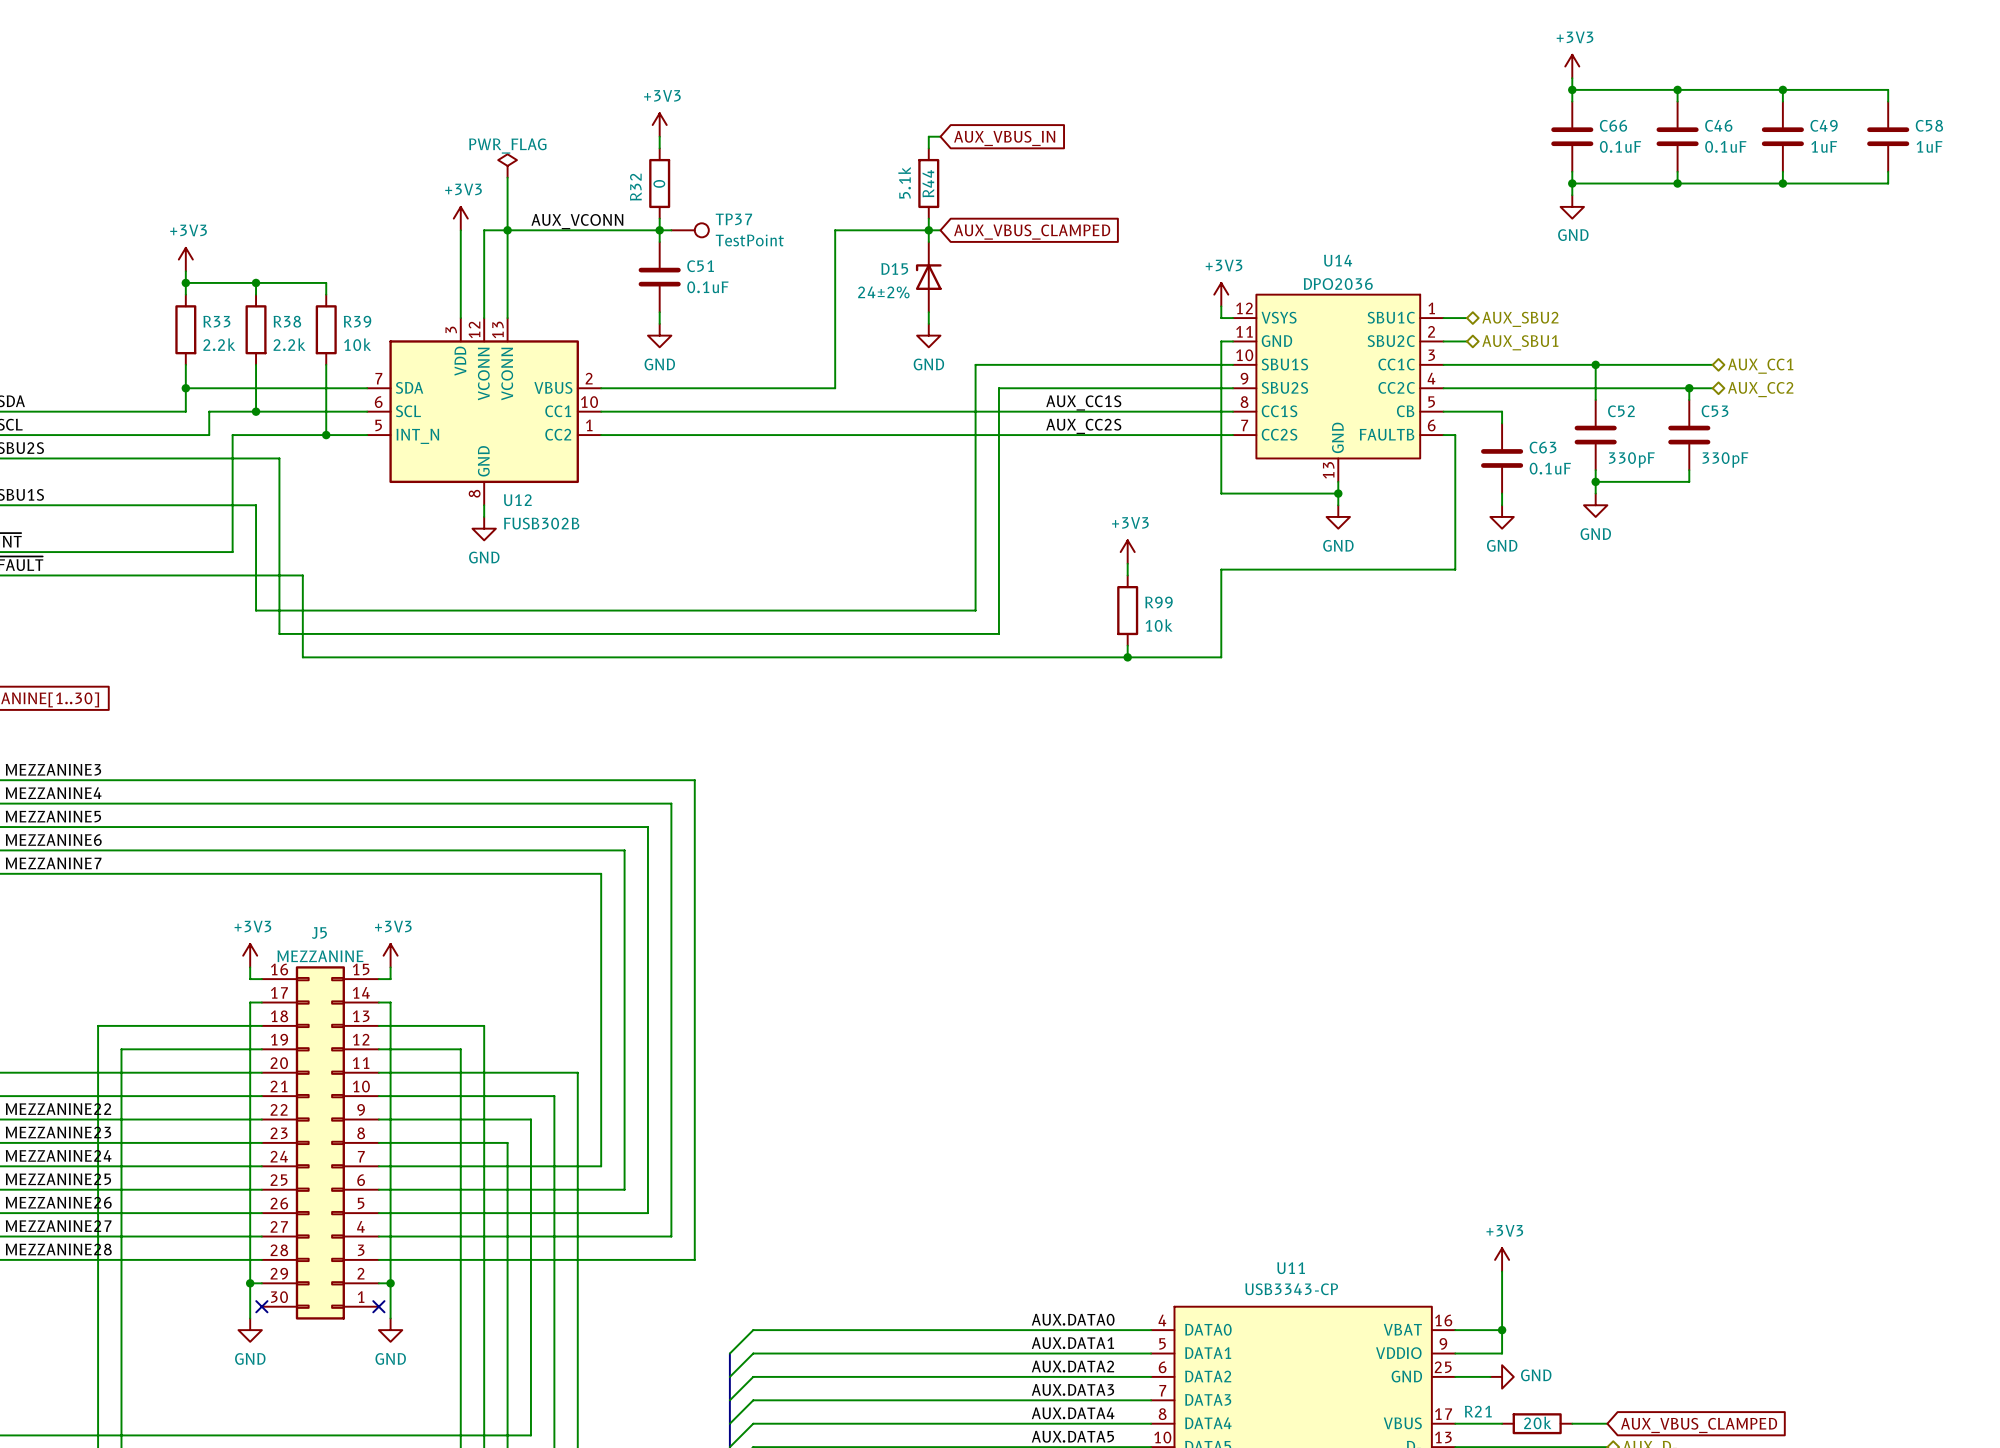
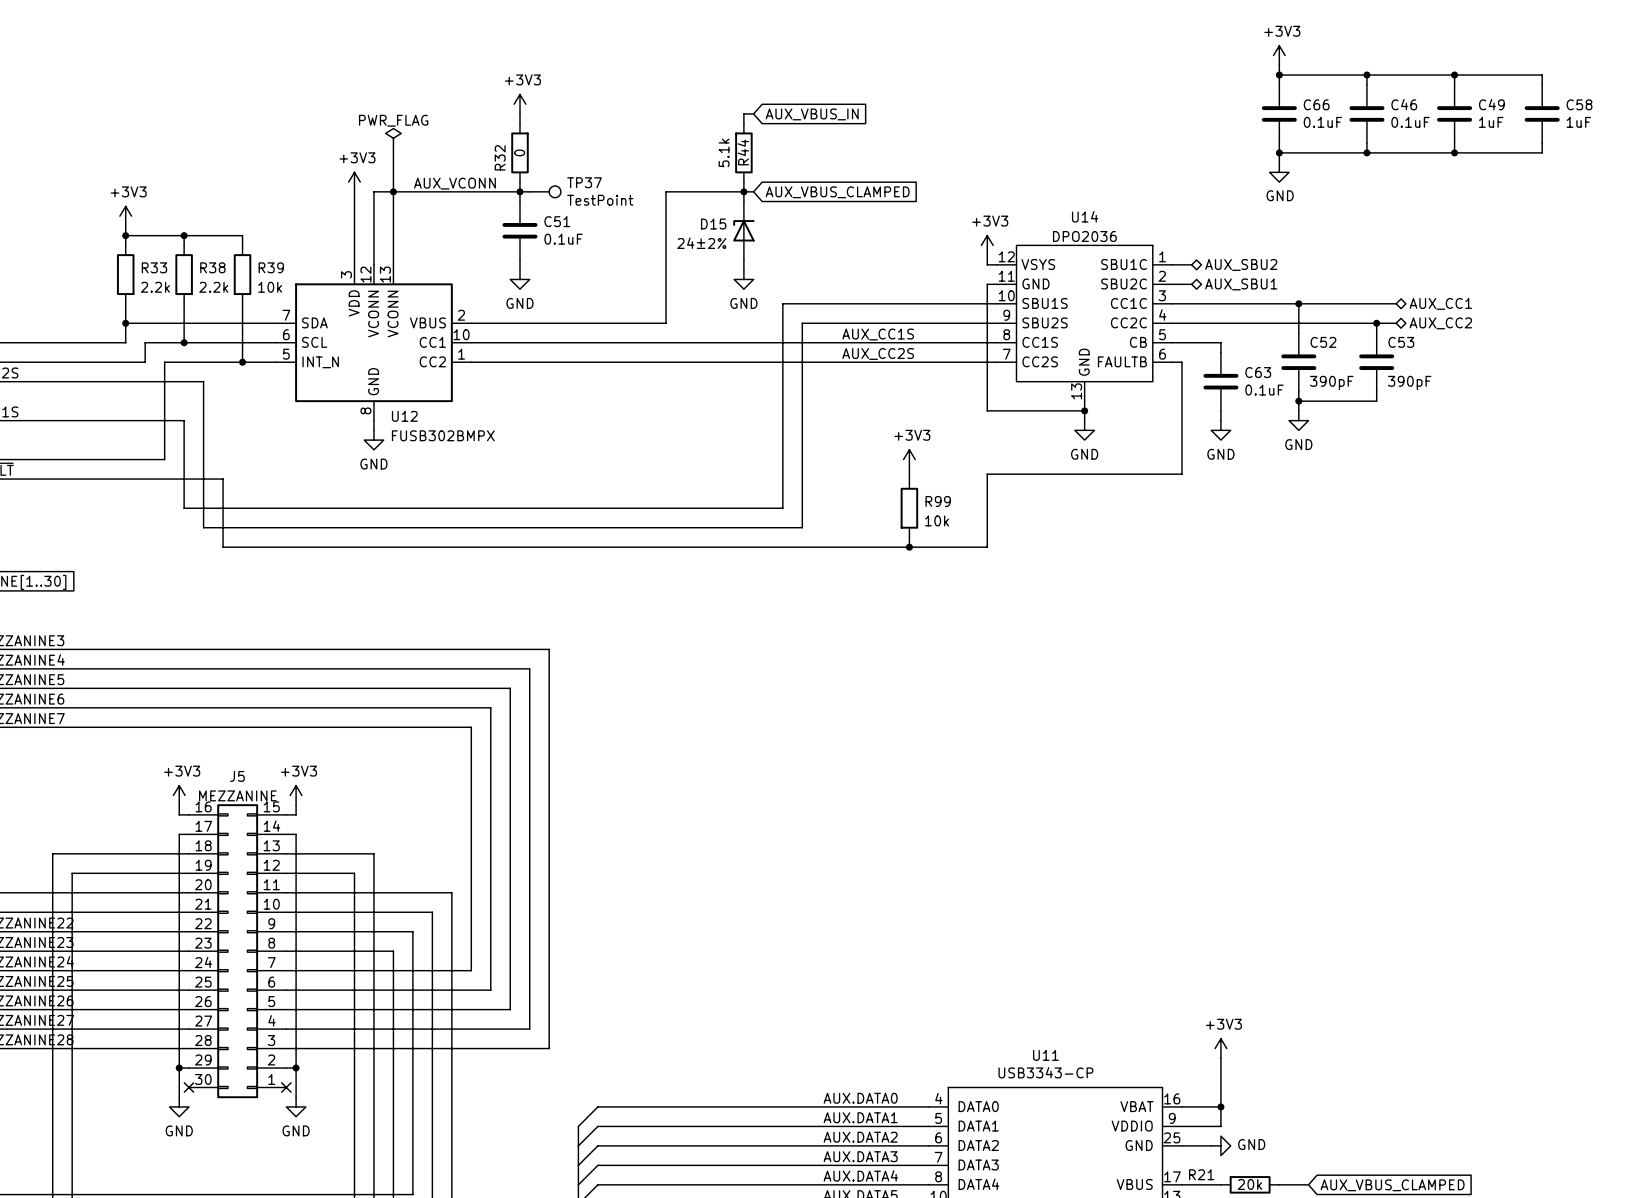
C52 value: 330pF (1631, 459) -> 390pF (1331, 382)
C53 value: 330pF (1725, 459) -> 390pF (1409, 382)
U12 value: FUSB302B (541, 523) -> FUSB302BMPX (443, 435)

